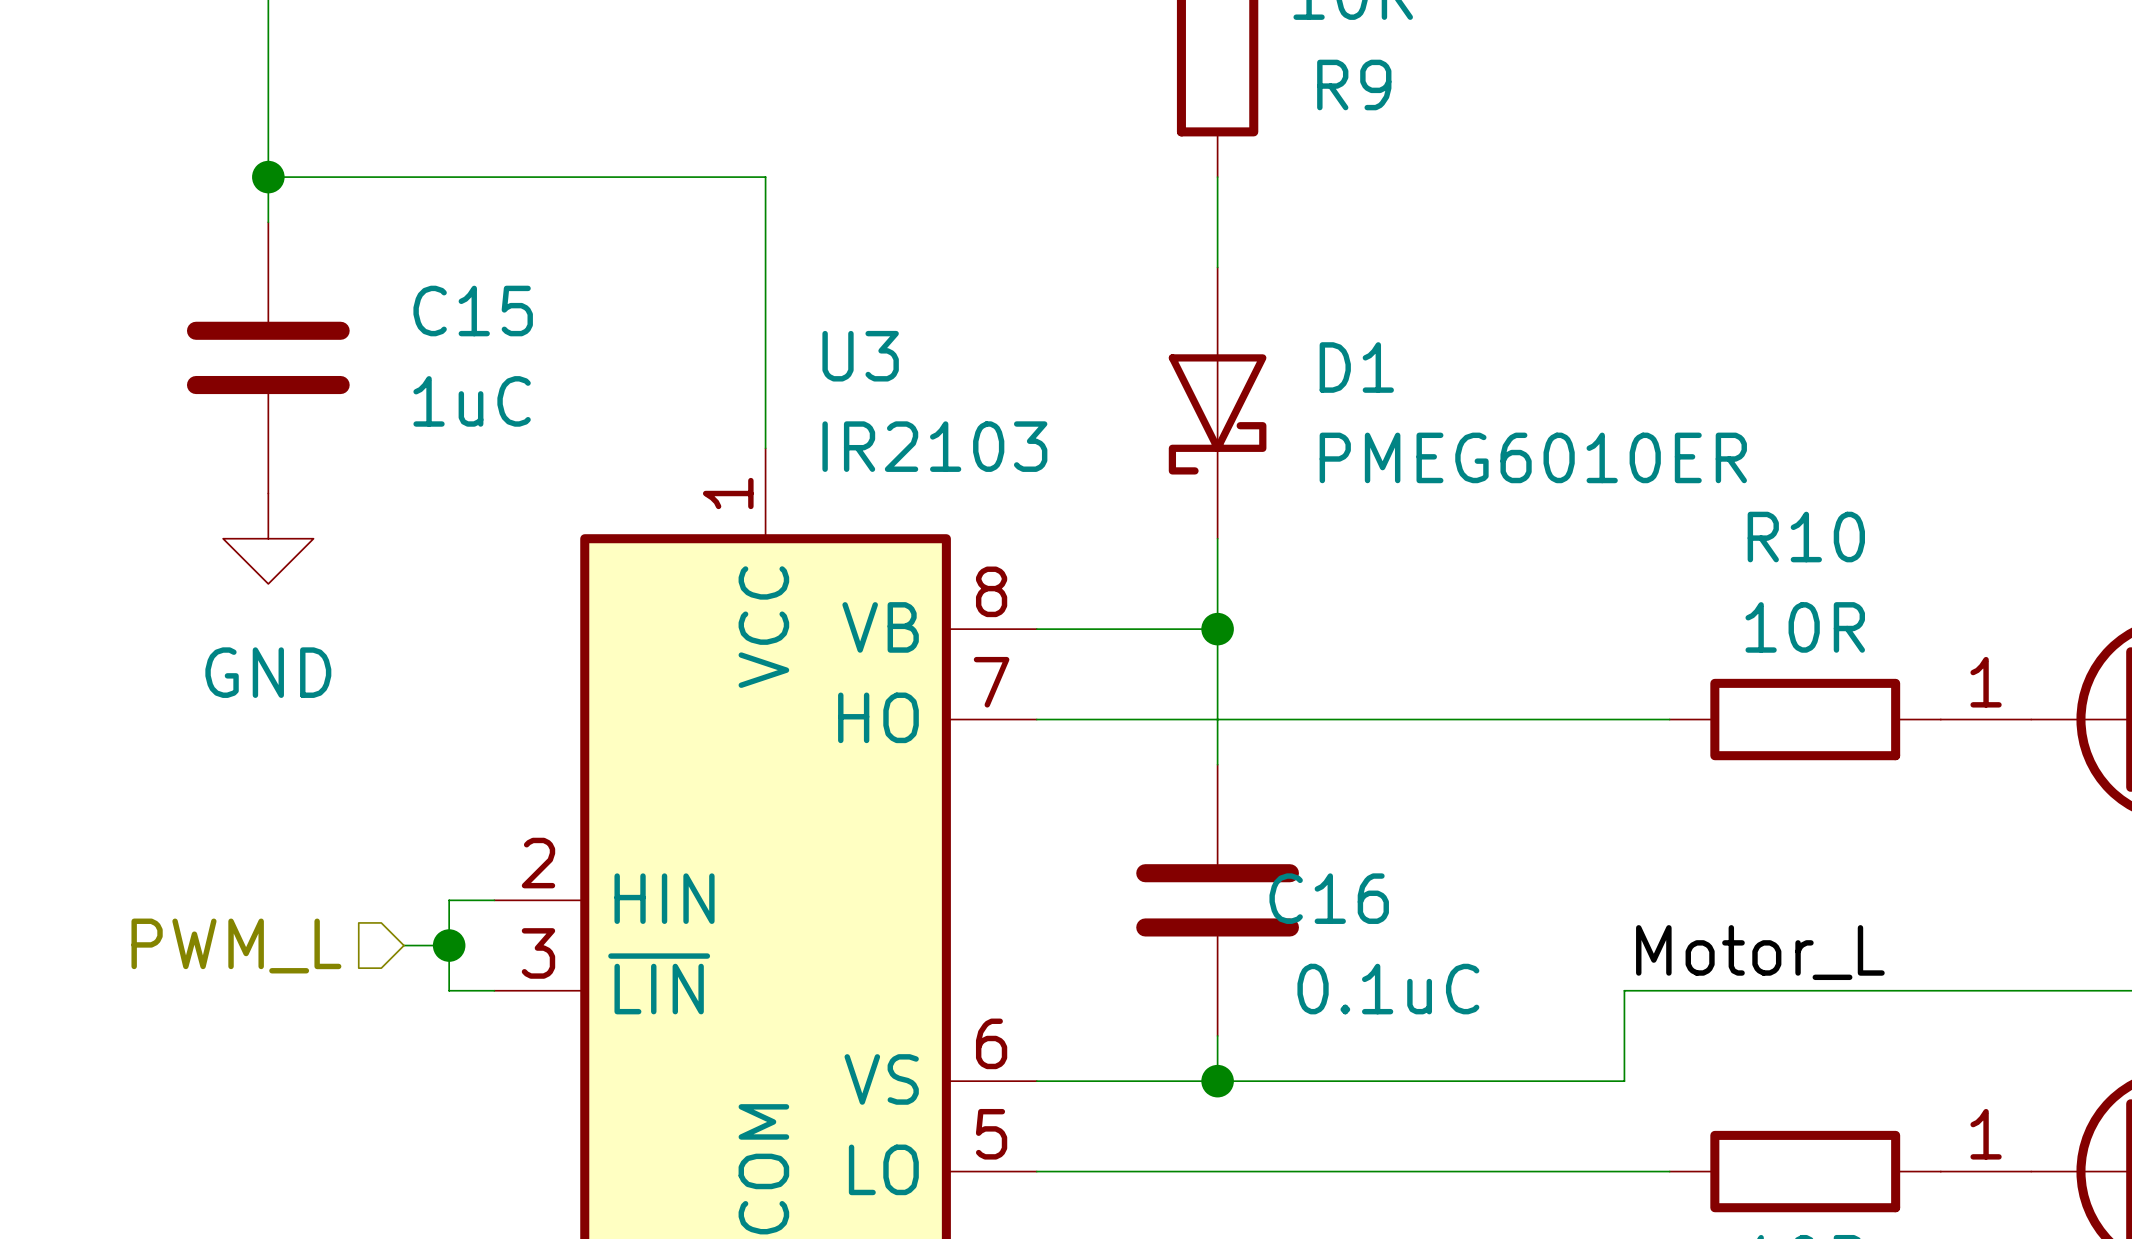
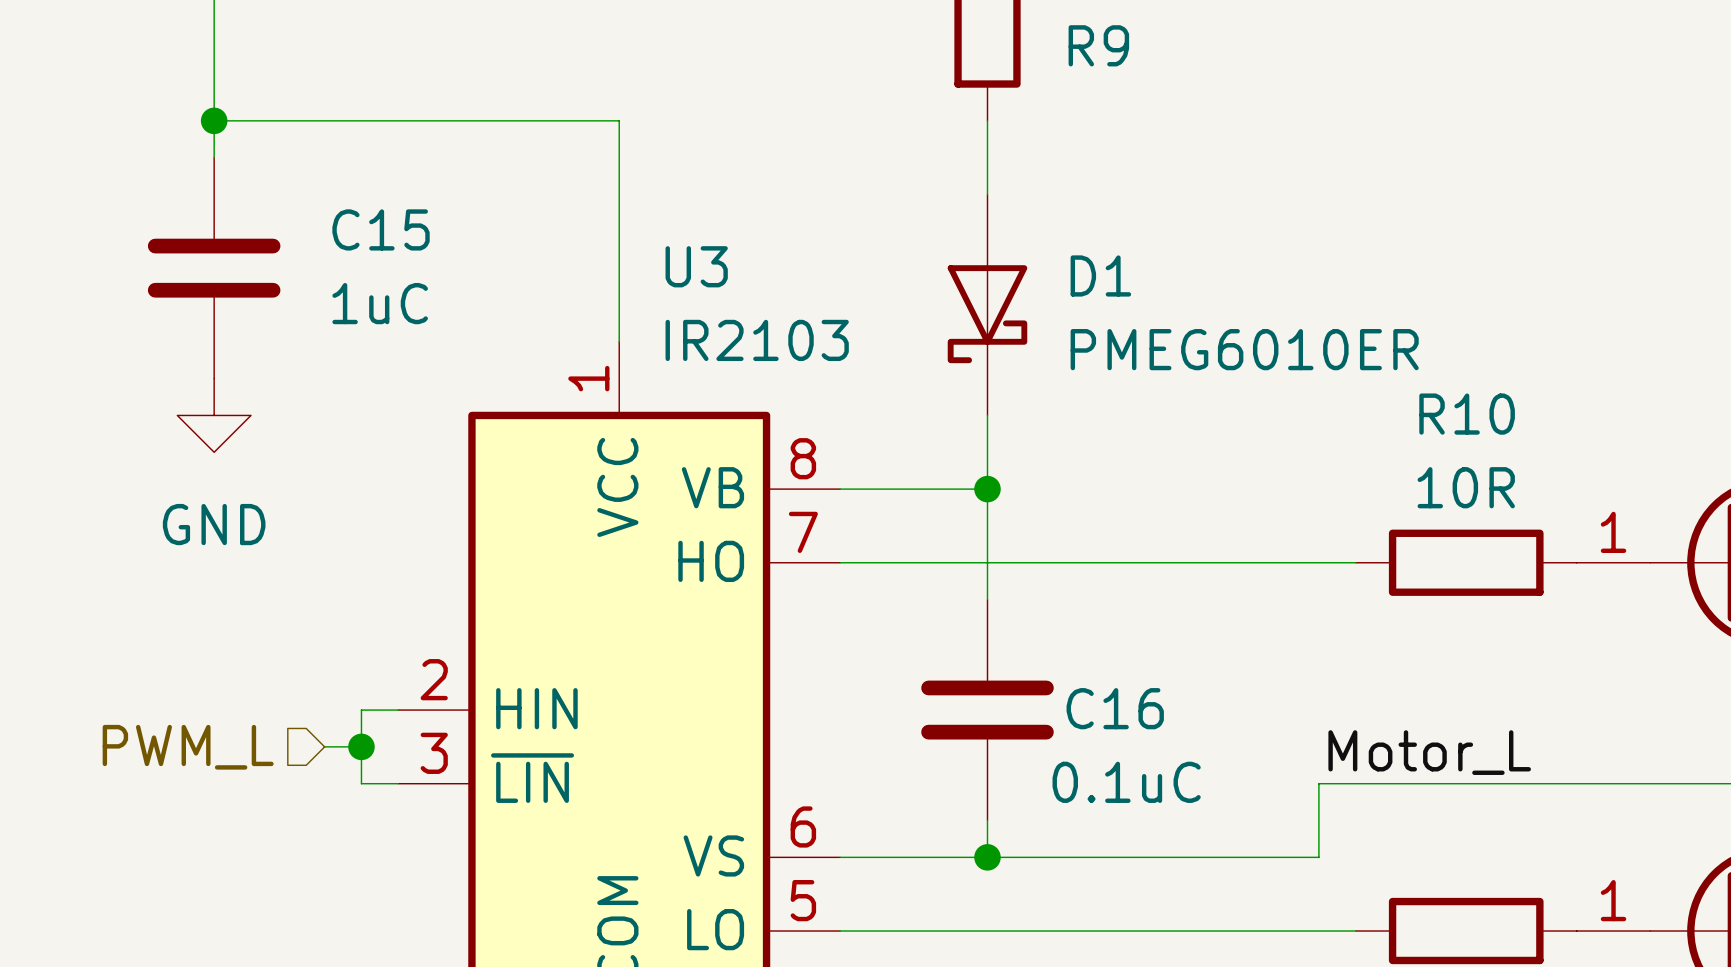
C16 name position: C16 (1329, 898) -> C16 (1115, 708)

